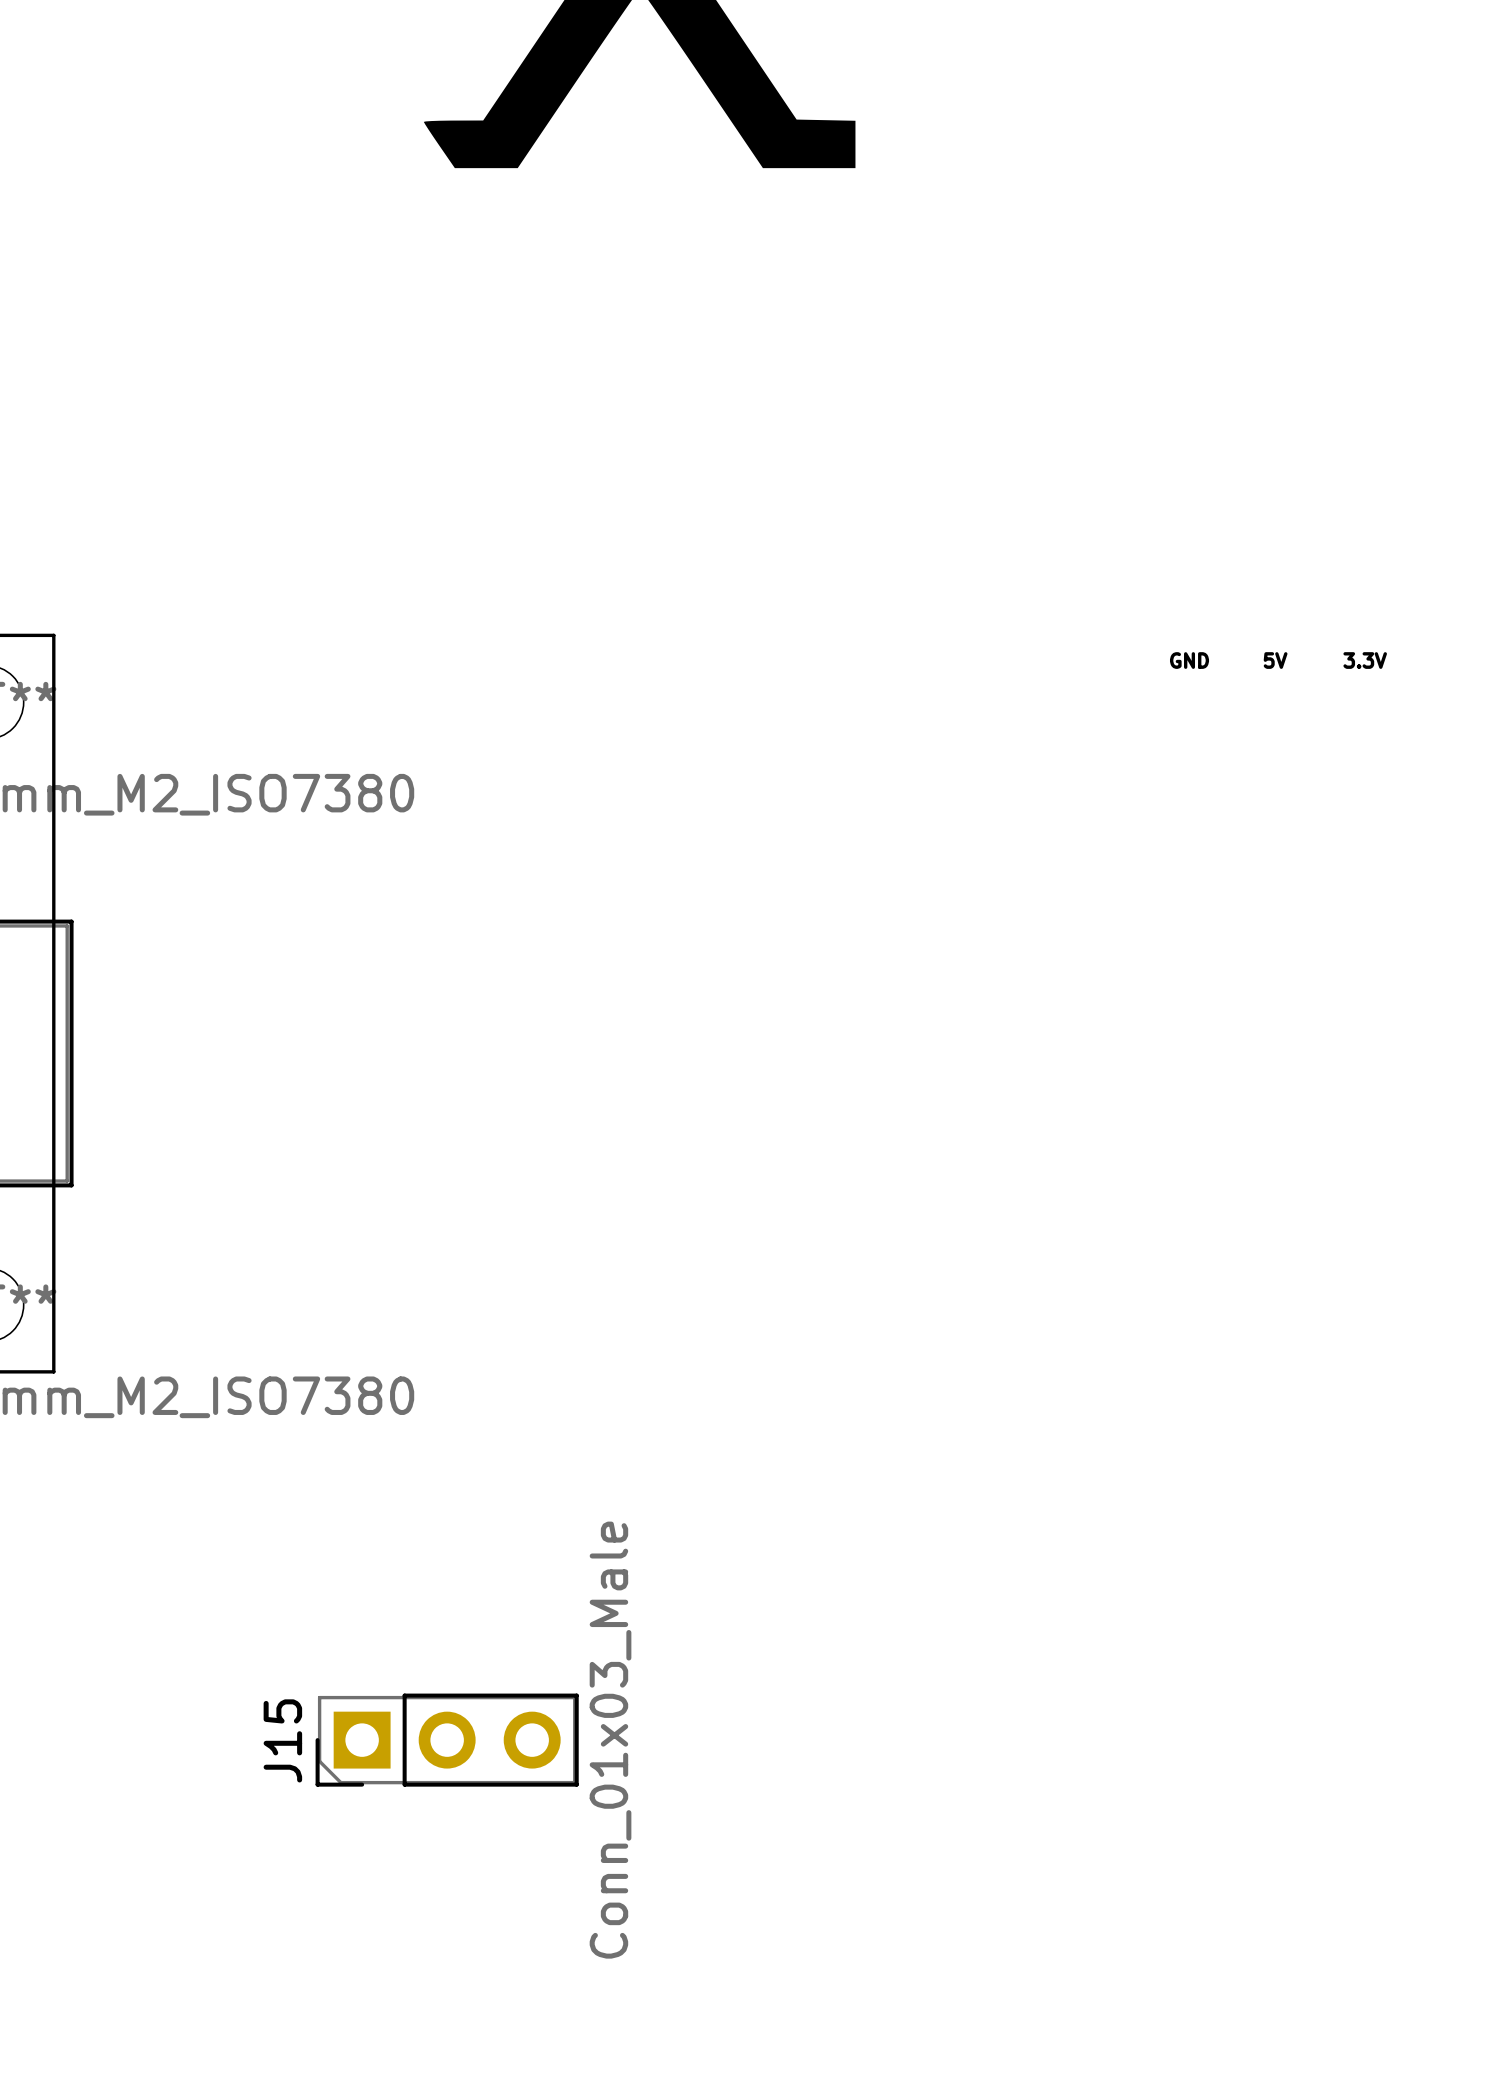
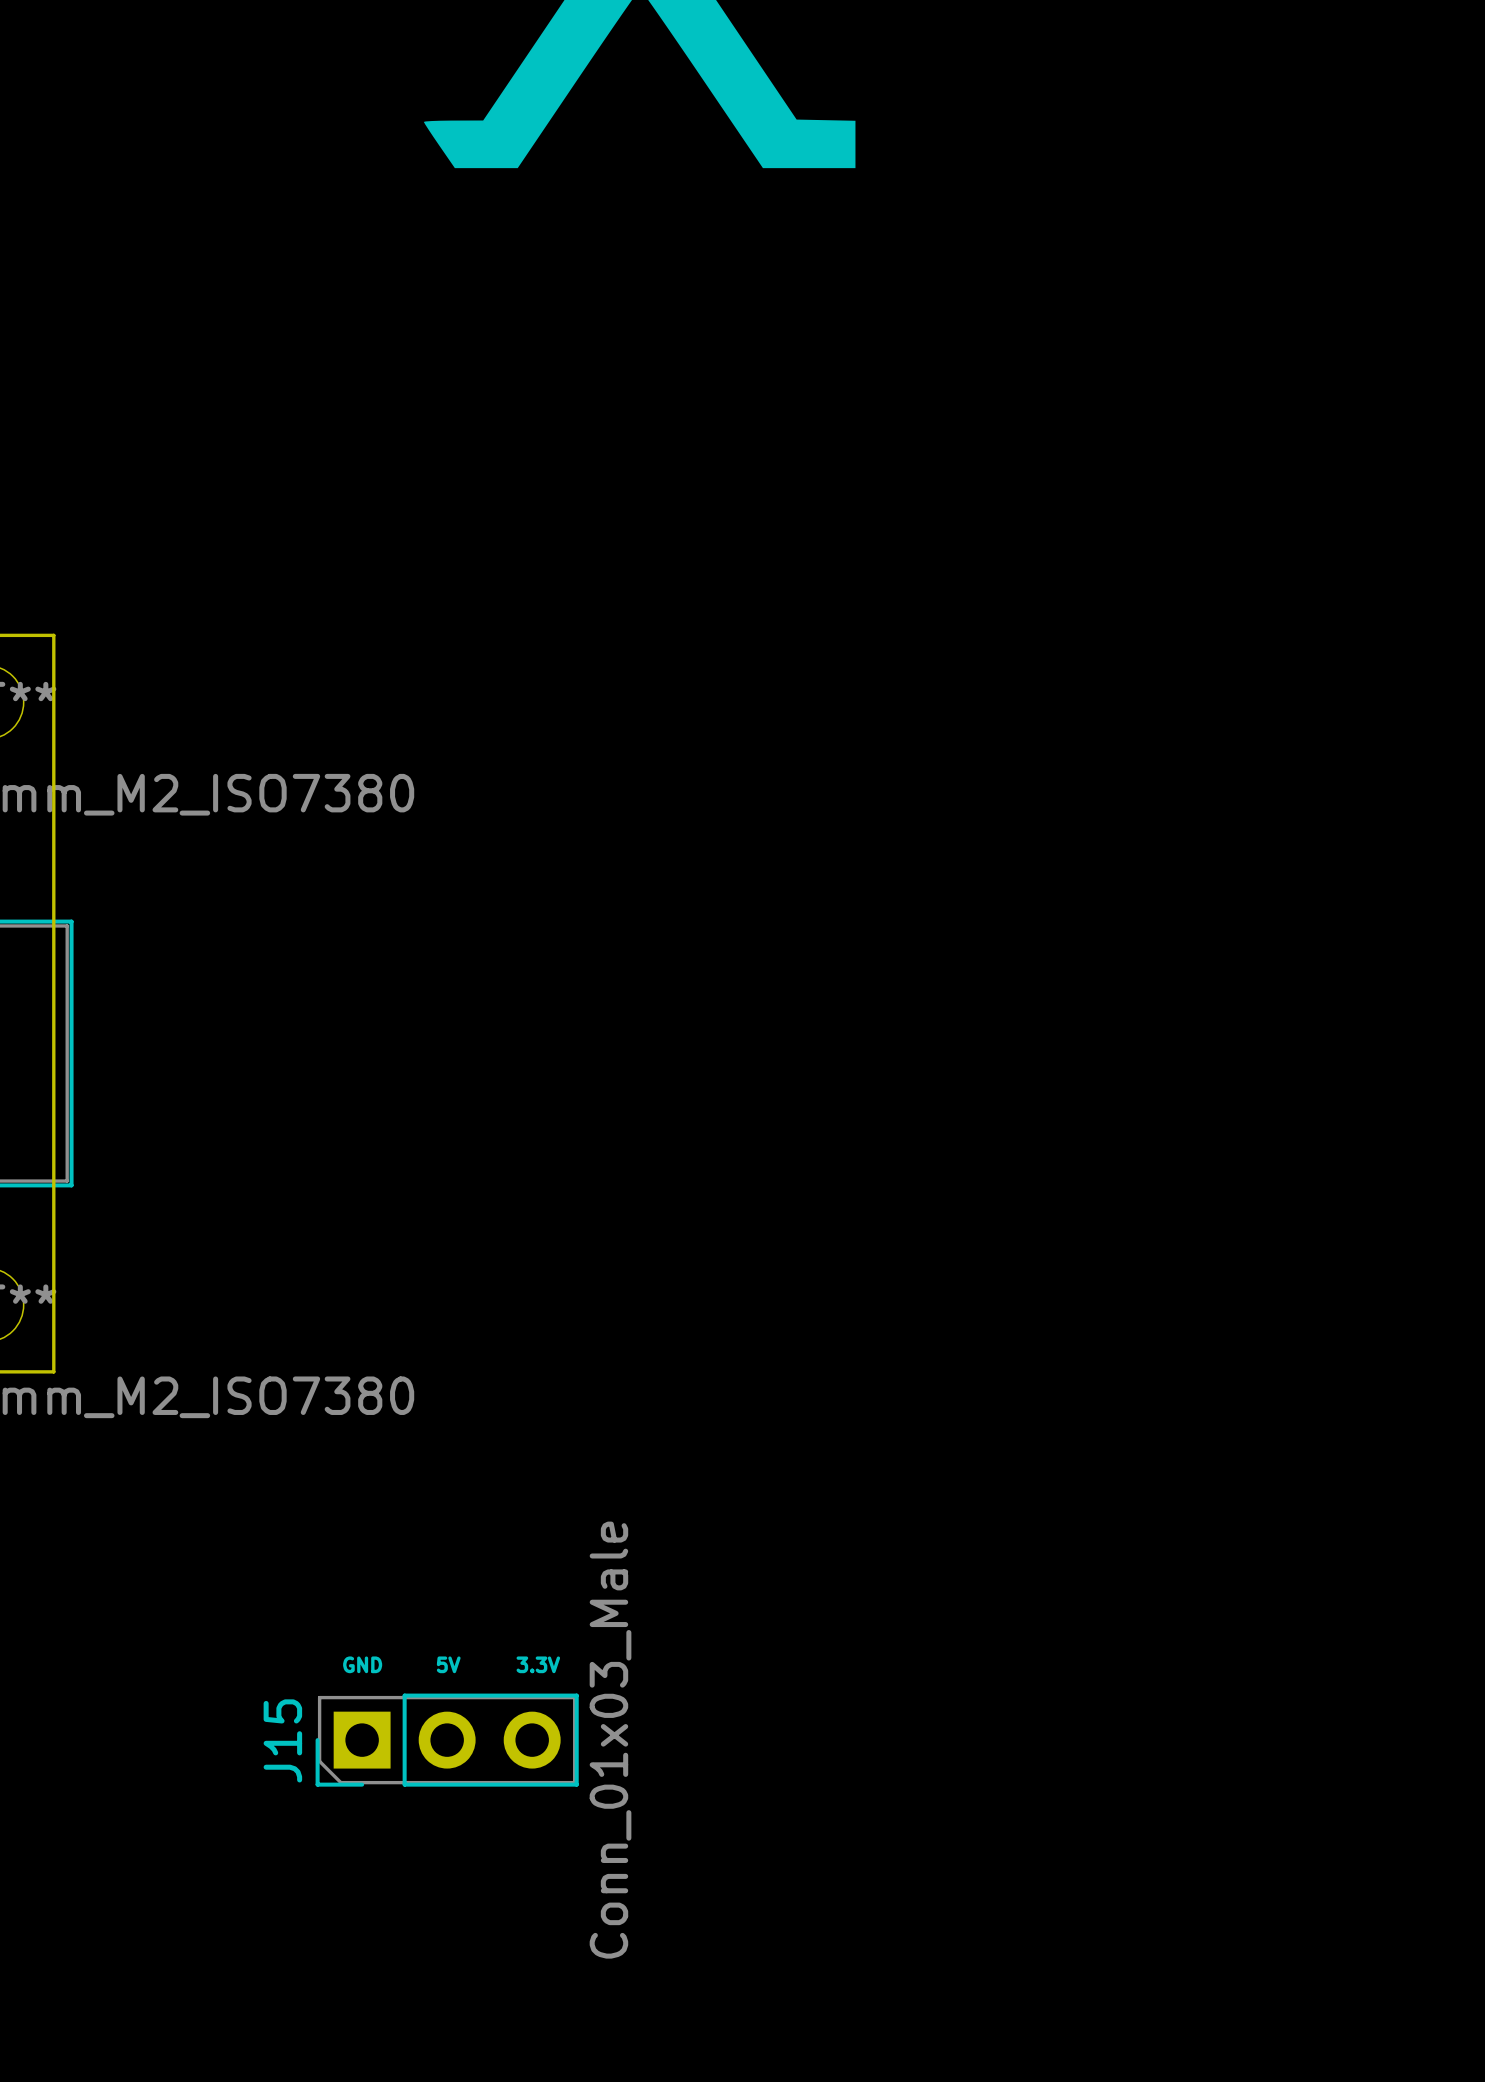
text: GND (1189, 660) -> none
text: 5V (1275, 660) -> none
text: 3.3V (1365, 660) -> none
text: none -> GND (362, 1664)
text: none -> 5V (448, 1664)
text: none -> 3.3V (538, 1664)

